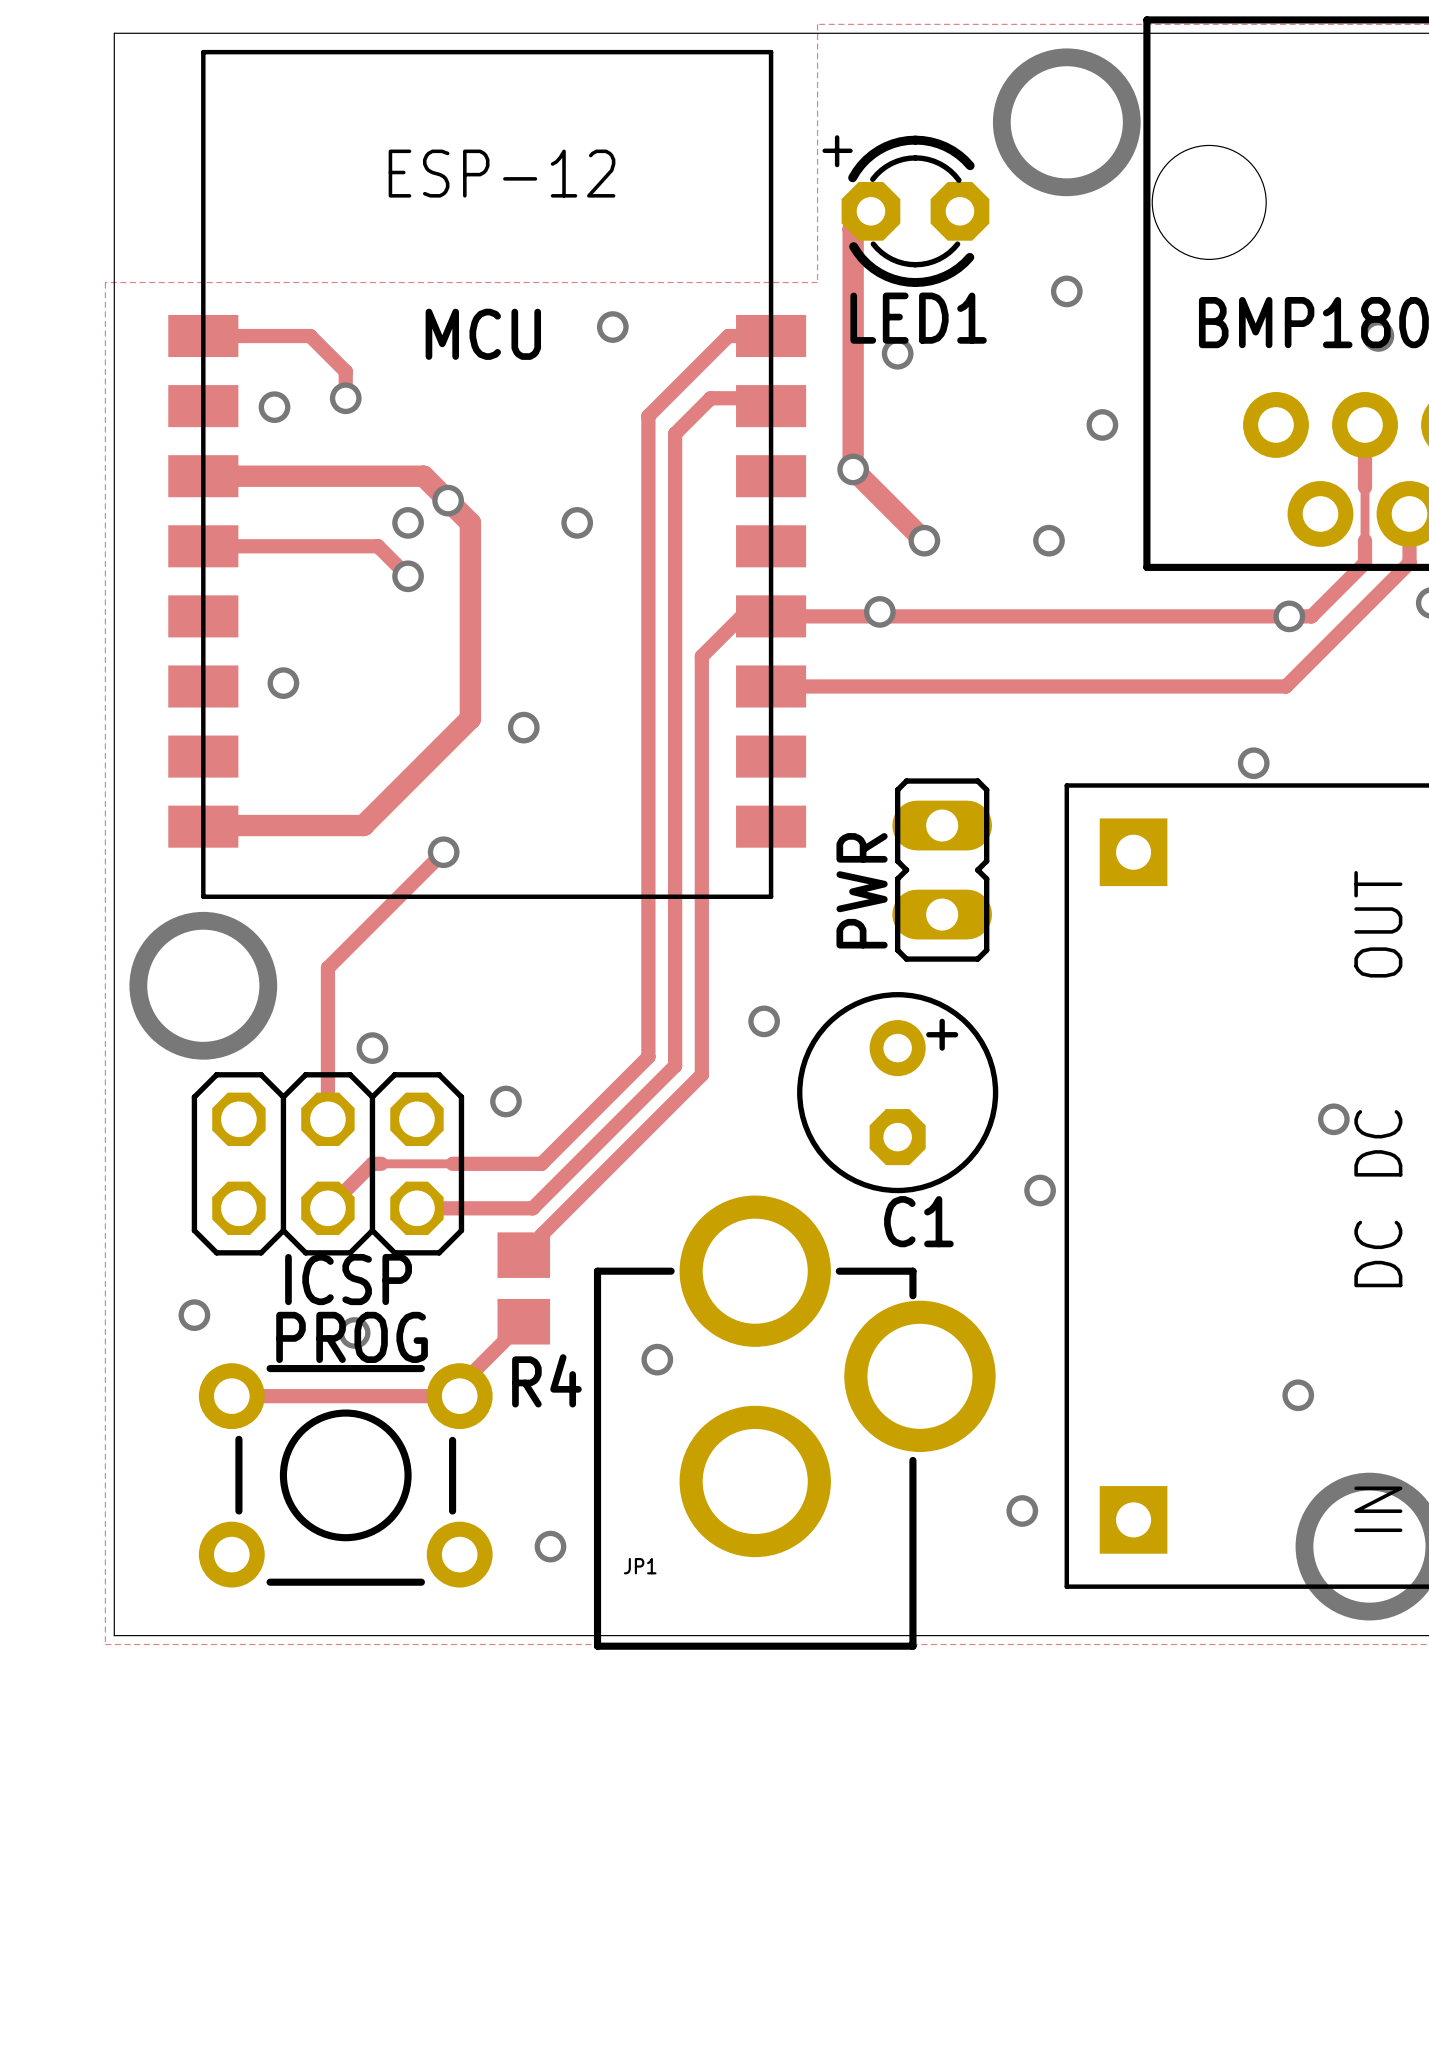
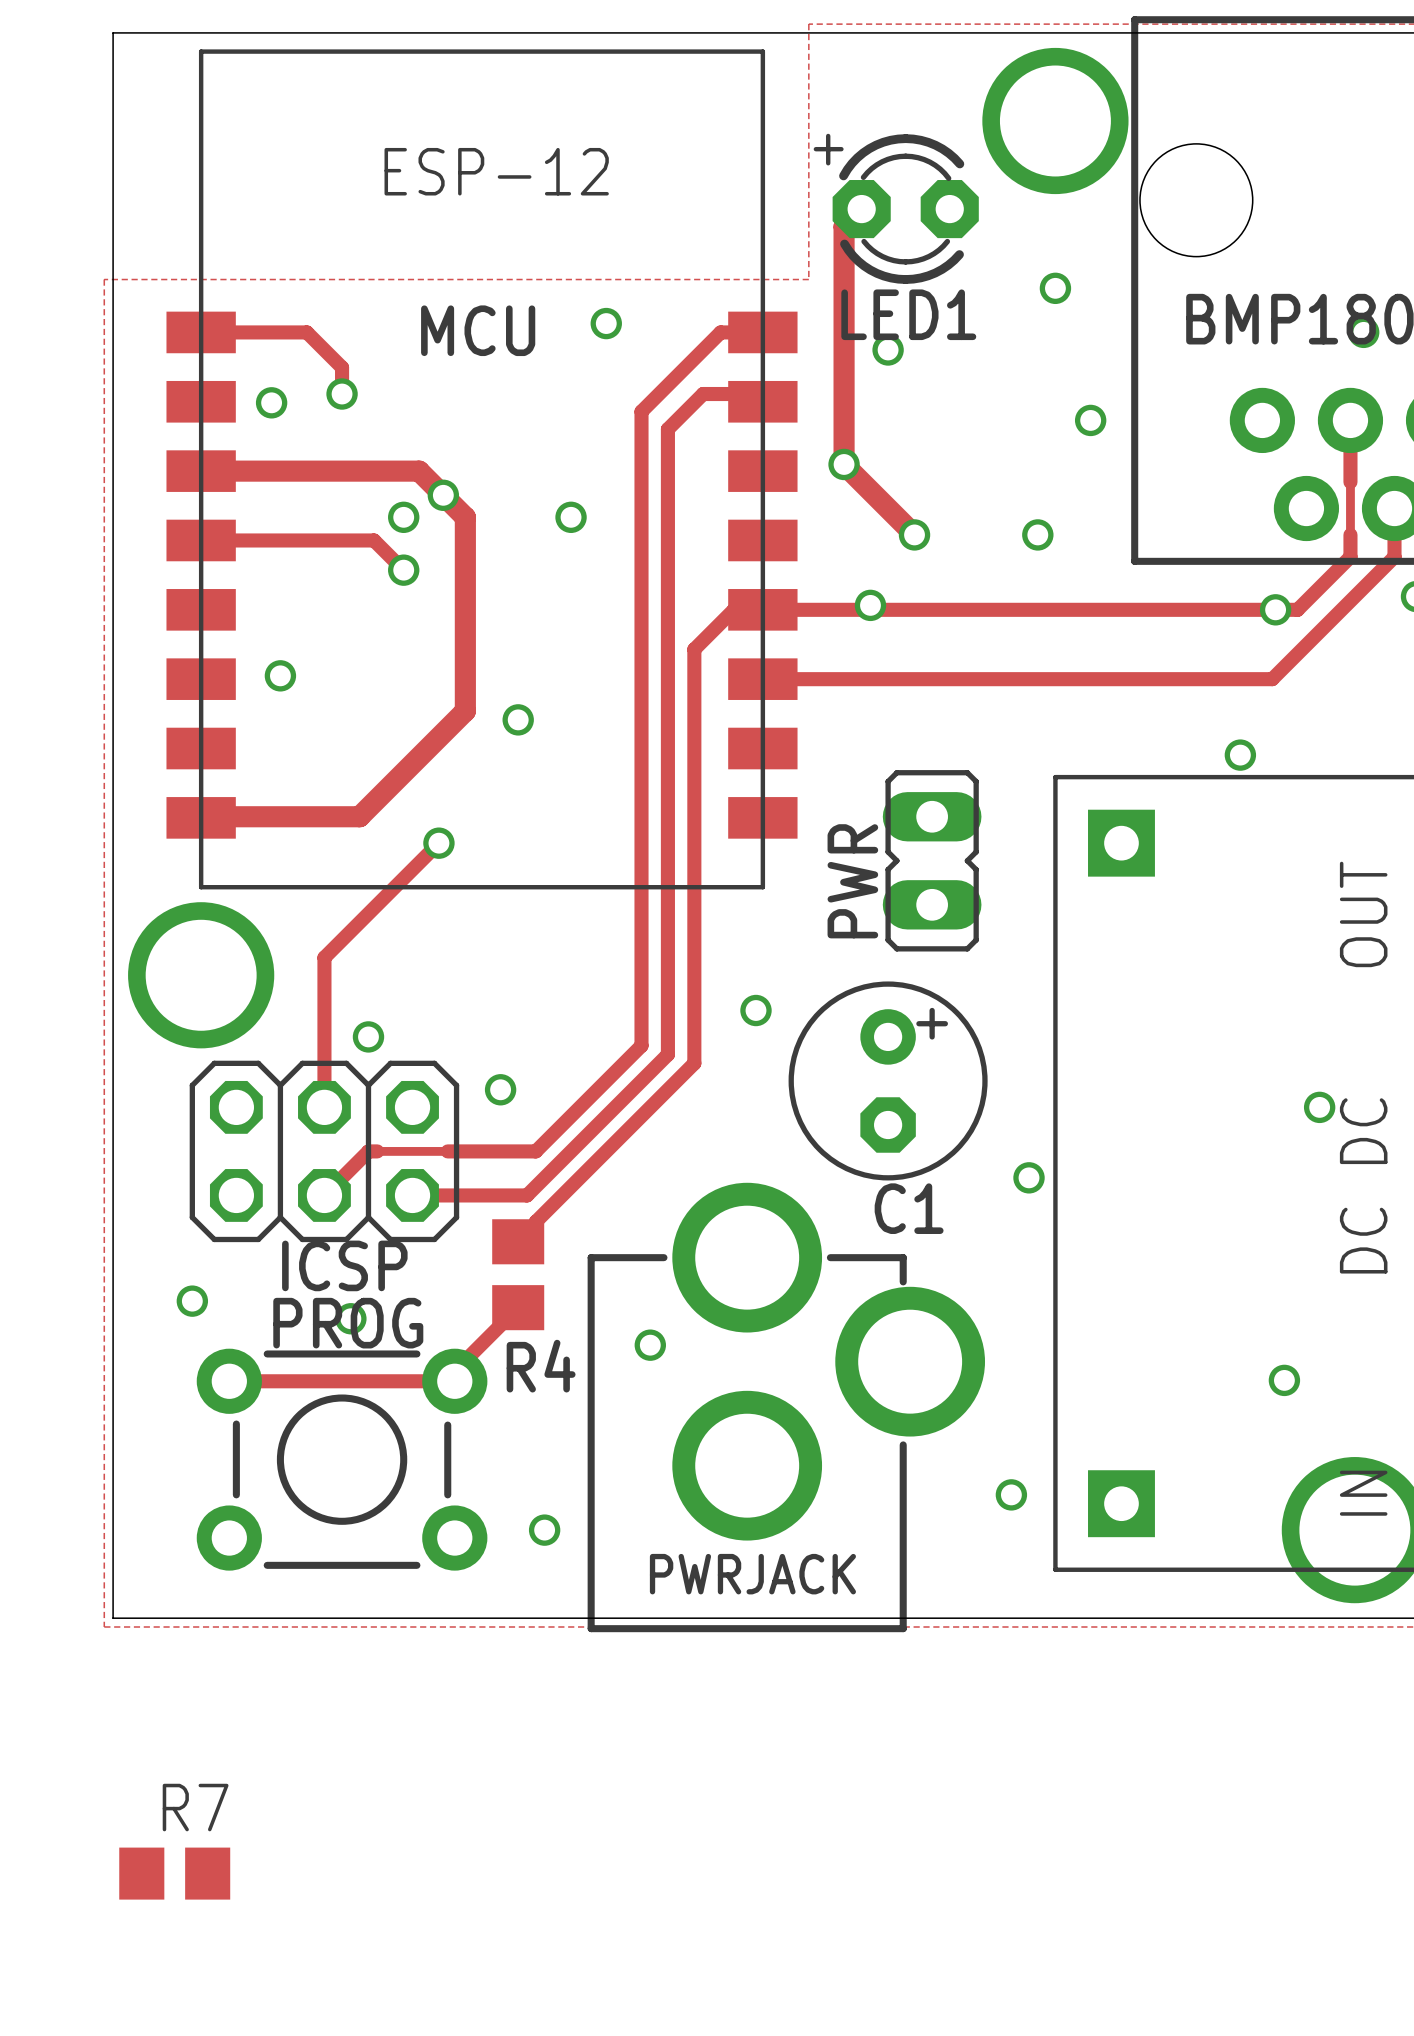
JP1 name: JP1 (640, 1566) -> PWRJACK (752, 1574)
R7: none -> (174, 1873)

